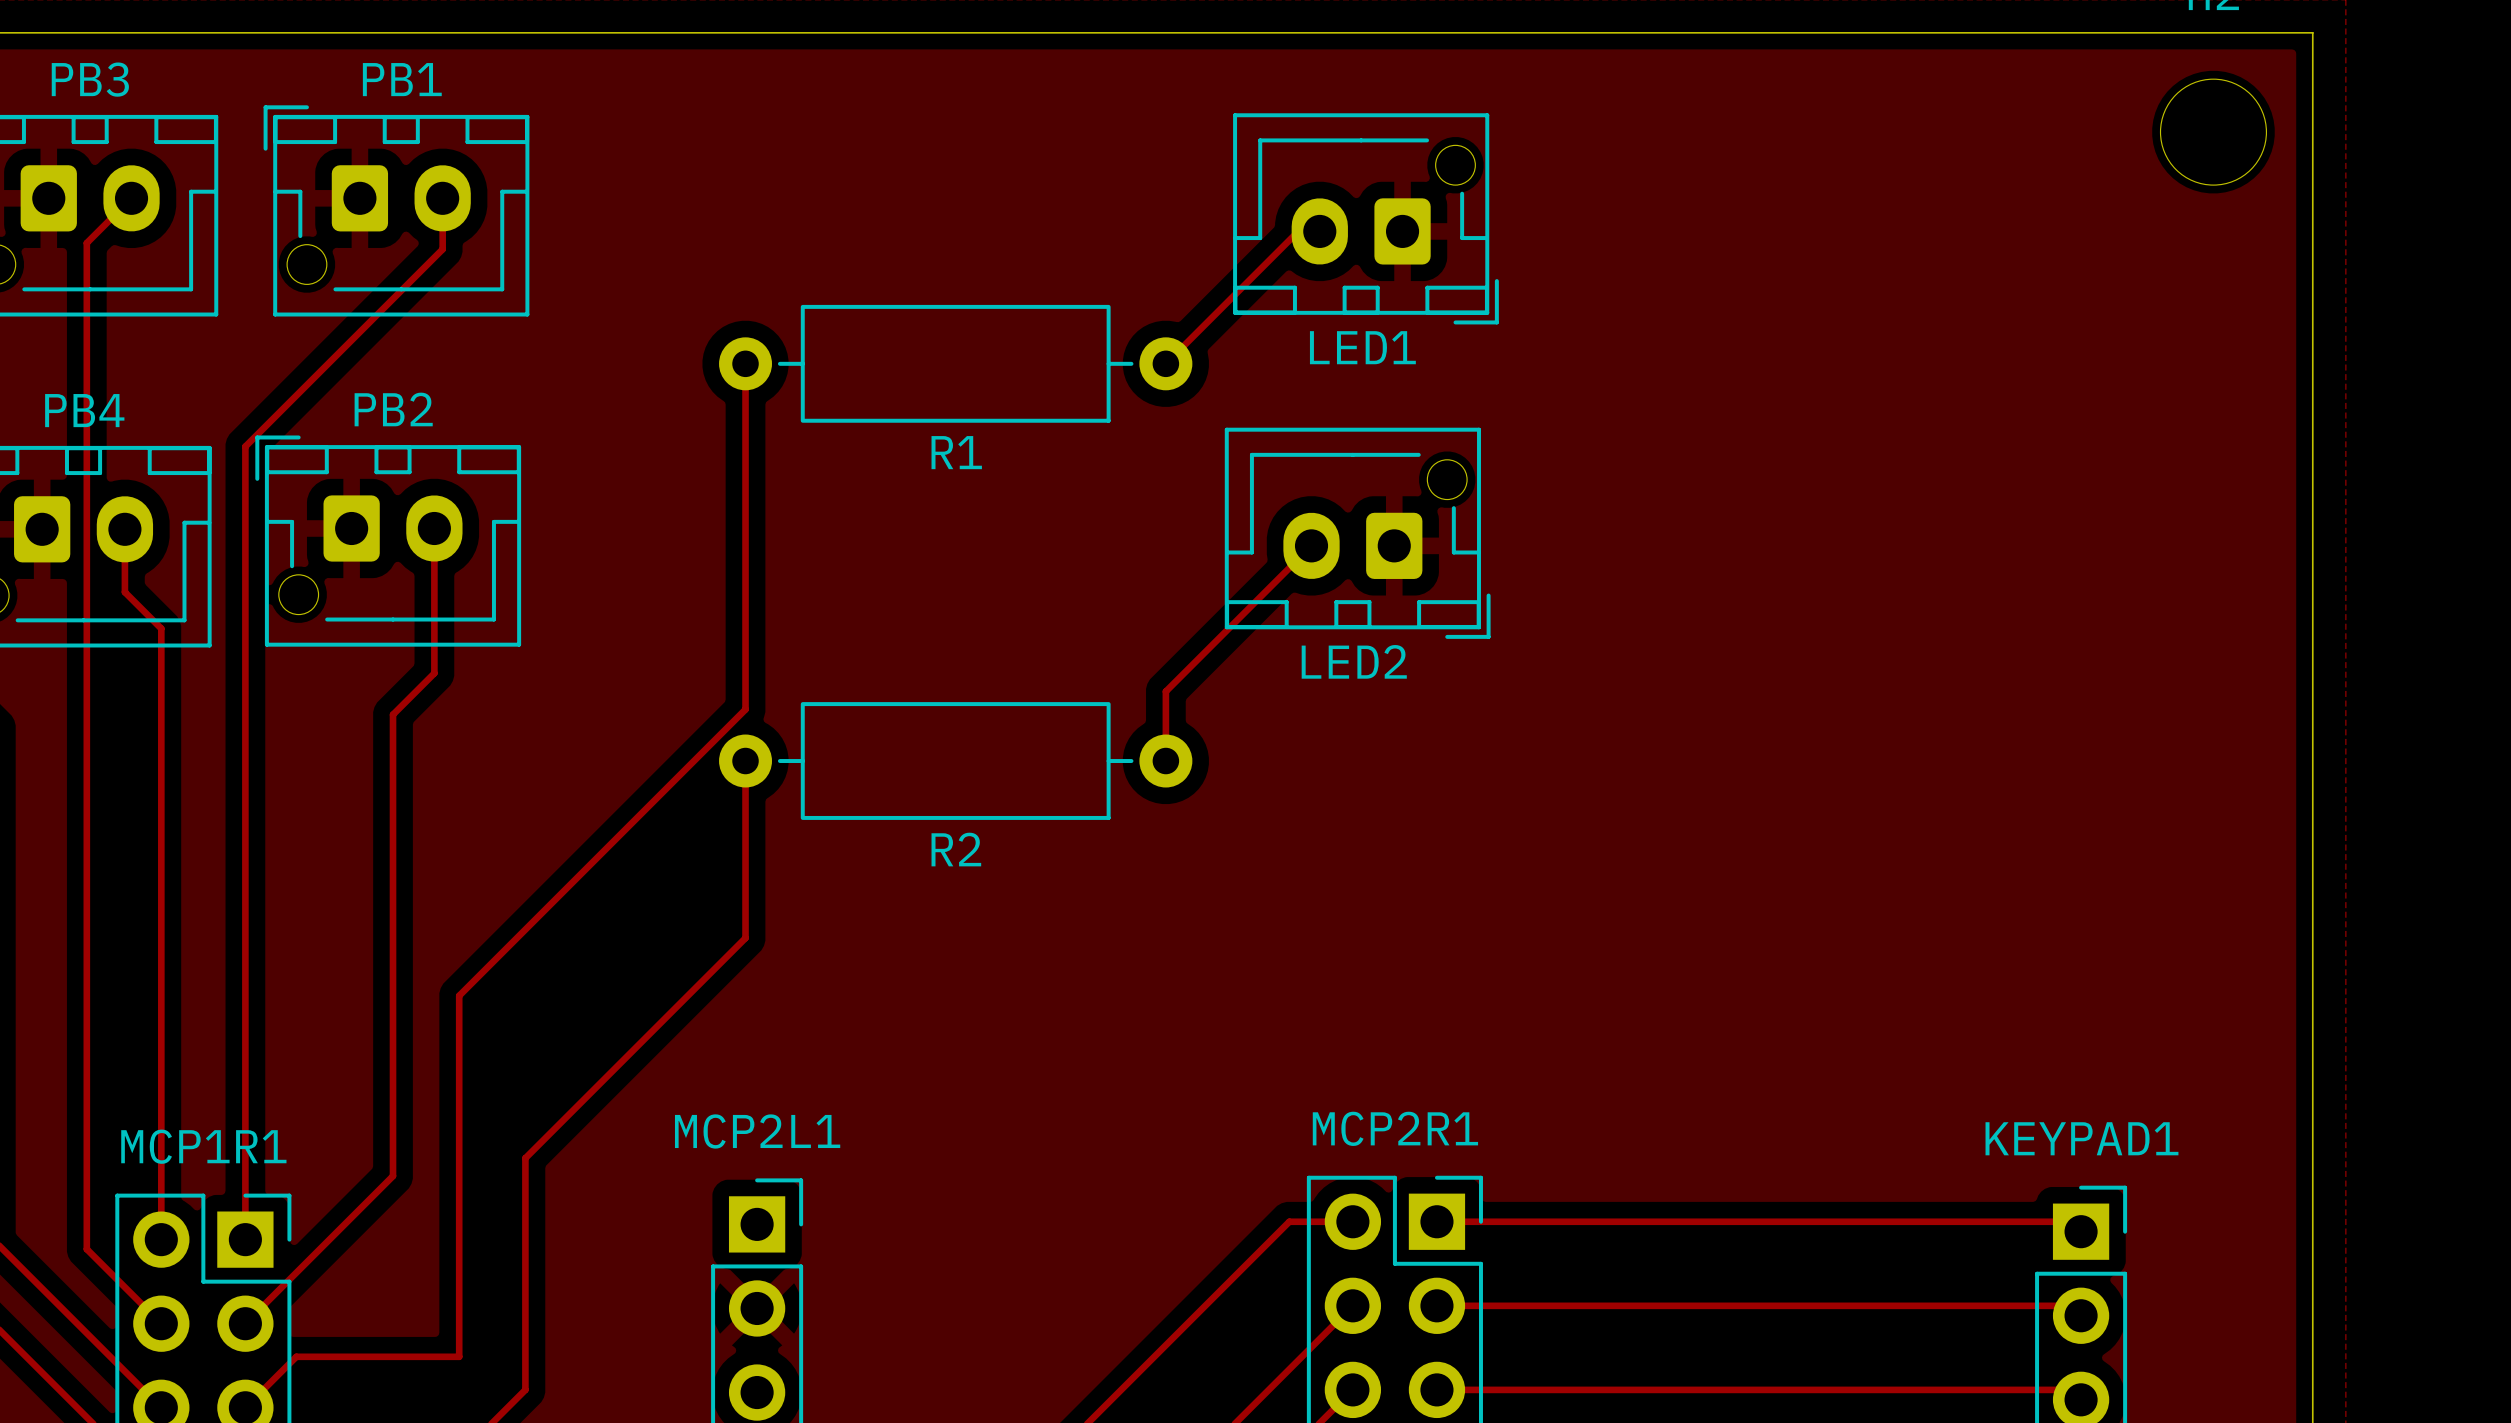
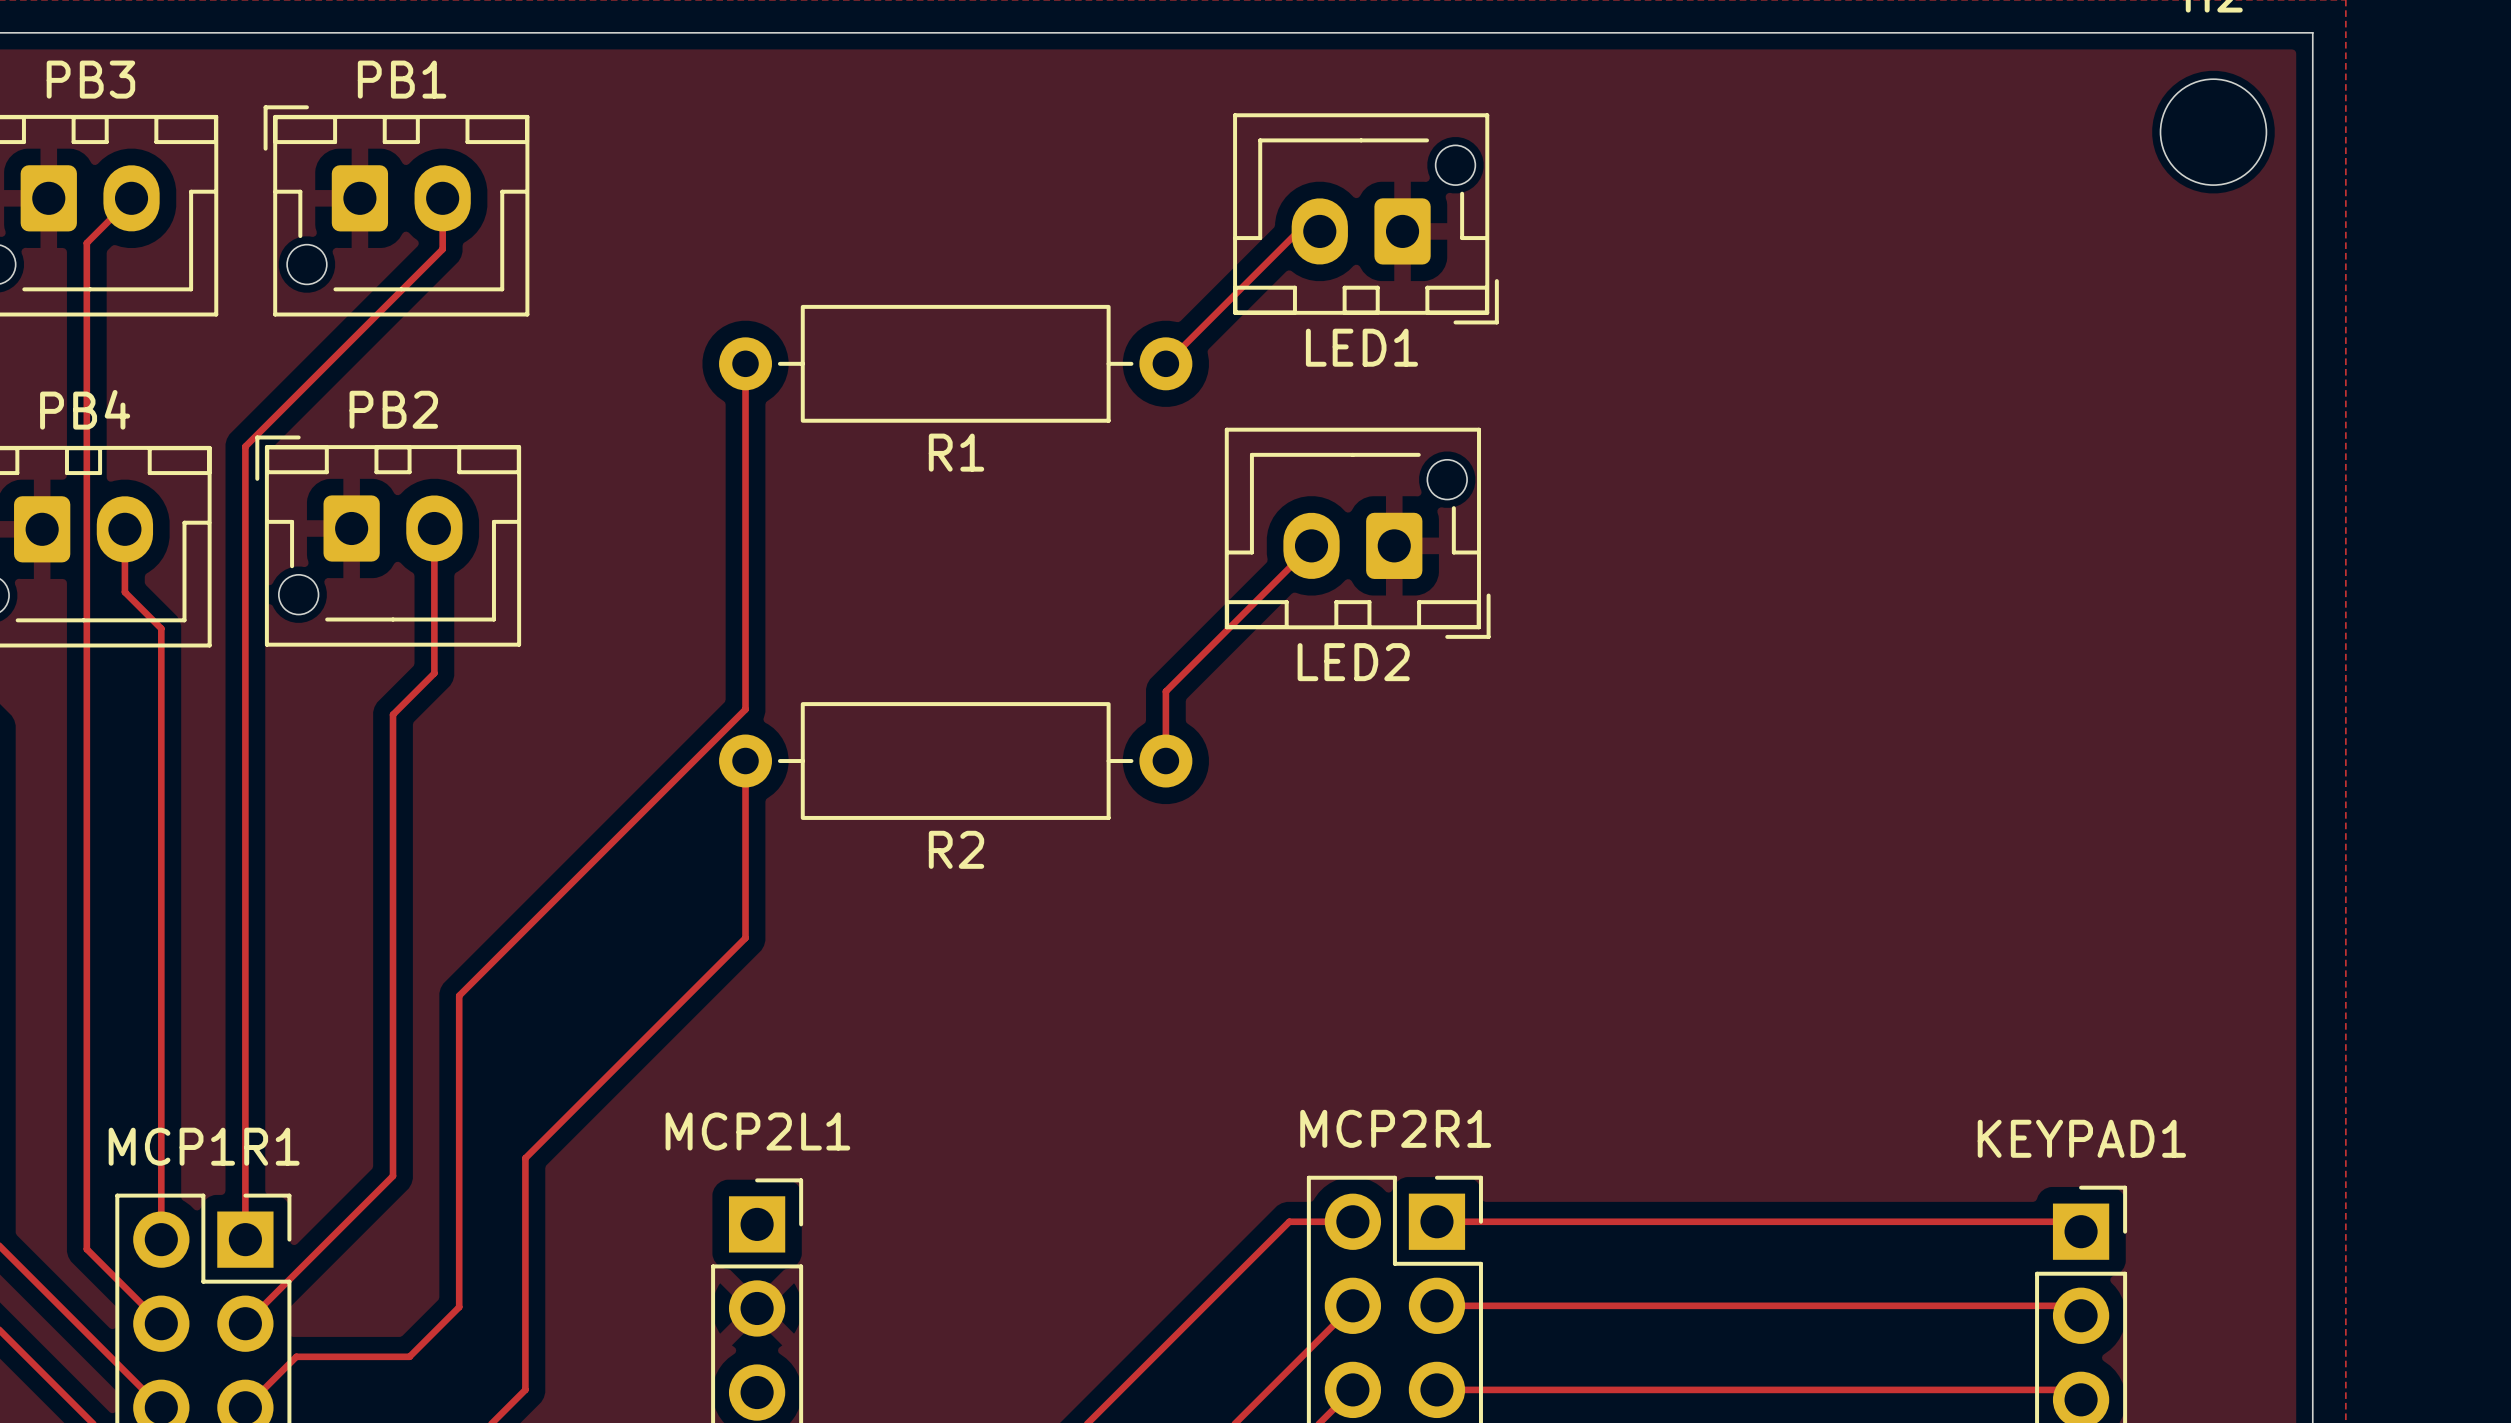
track: (459, 1307) (459, 1356) (409, 1356) -> (459, 1307) (409, 1356)

